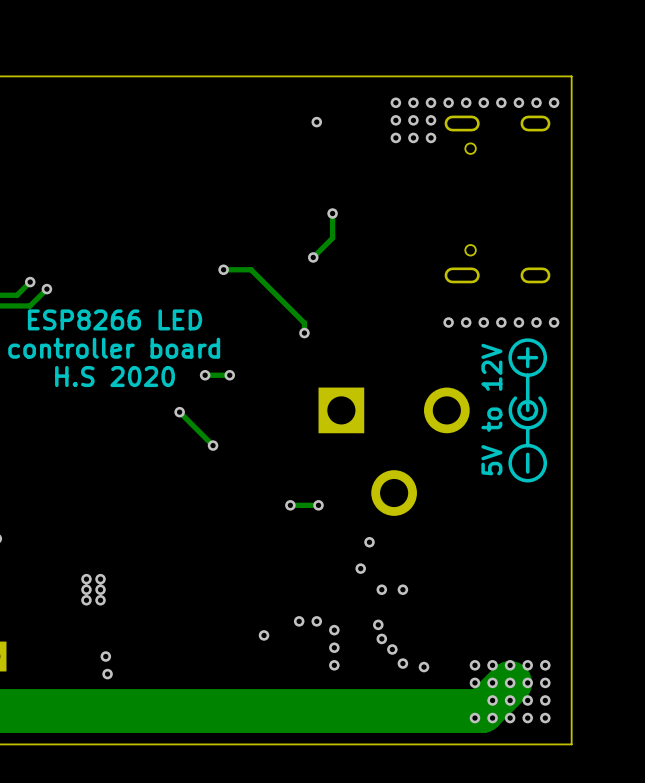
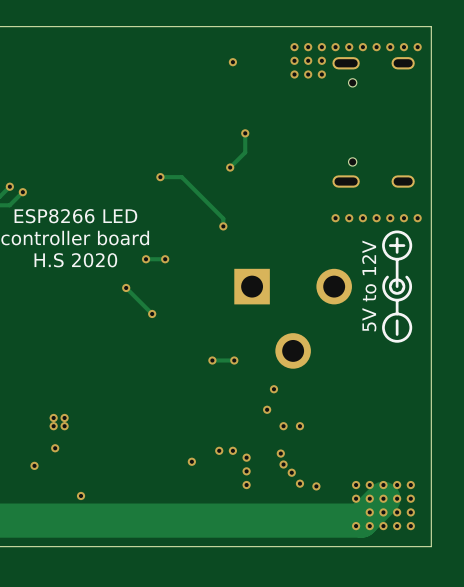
via: (86, 600) -> none
via: (100, 600) -> none
via: none -> (55, 448)
via: none -> (34, 465)
via: (105, 656) -> none
via: (107, 674) -> none
via: none -> (81, 495)

